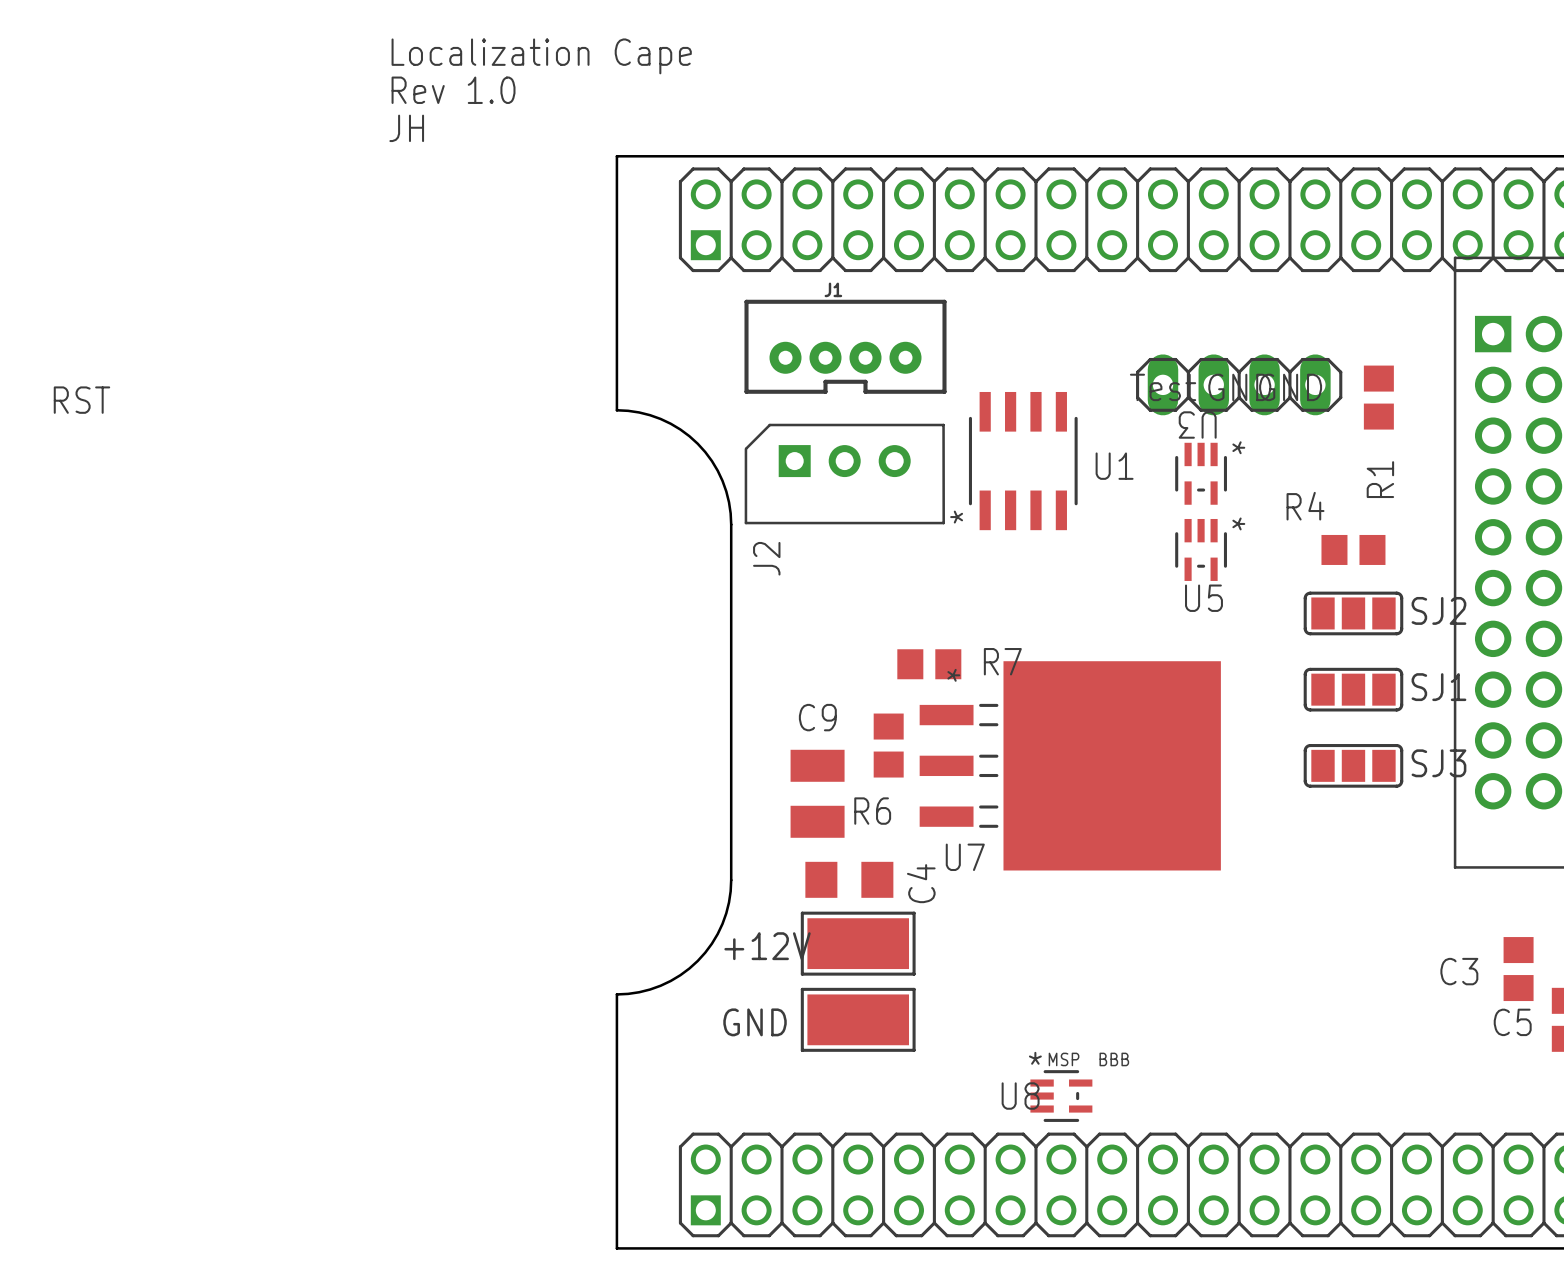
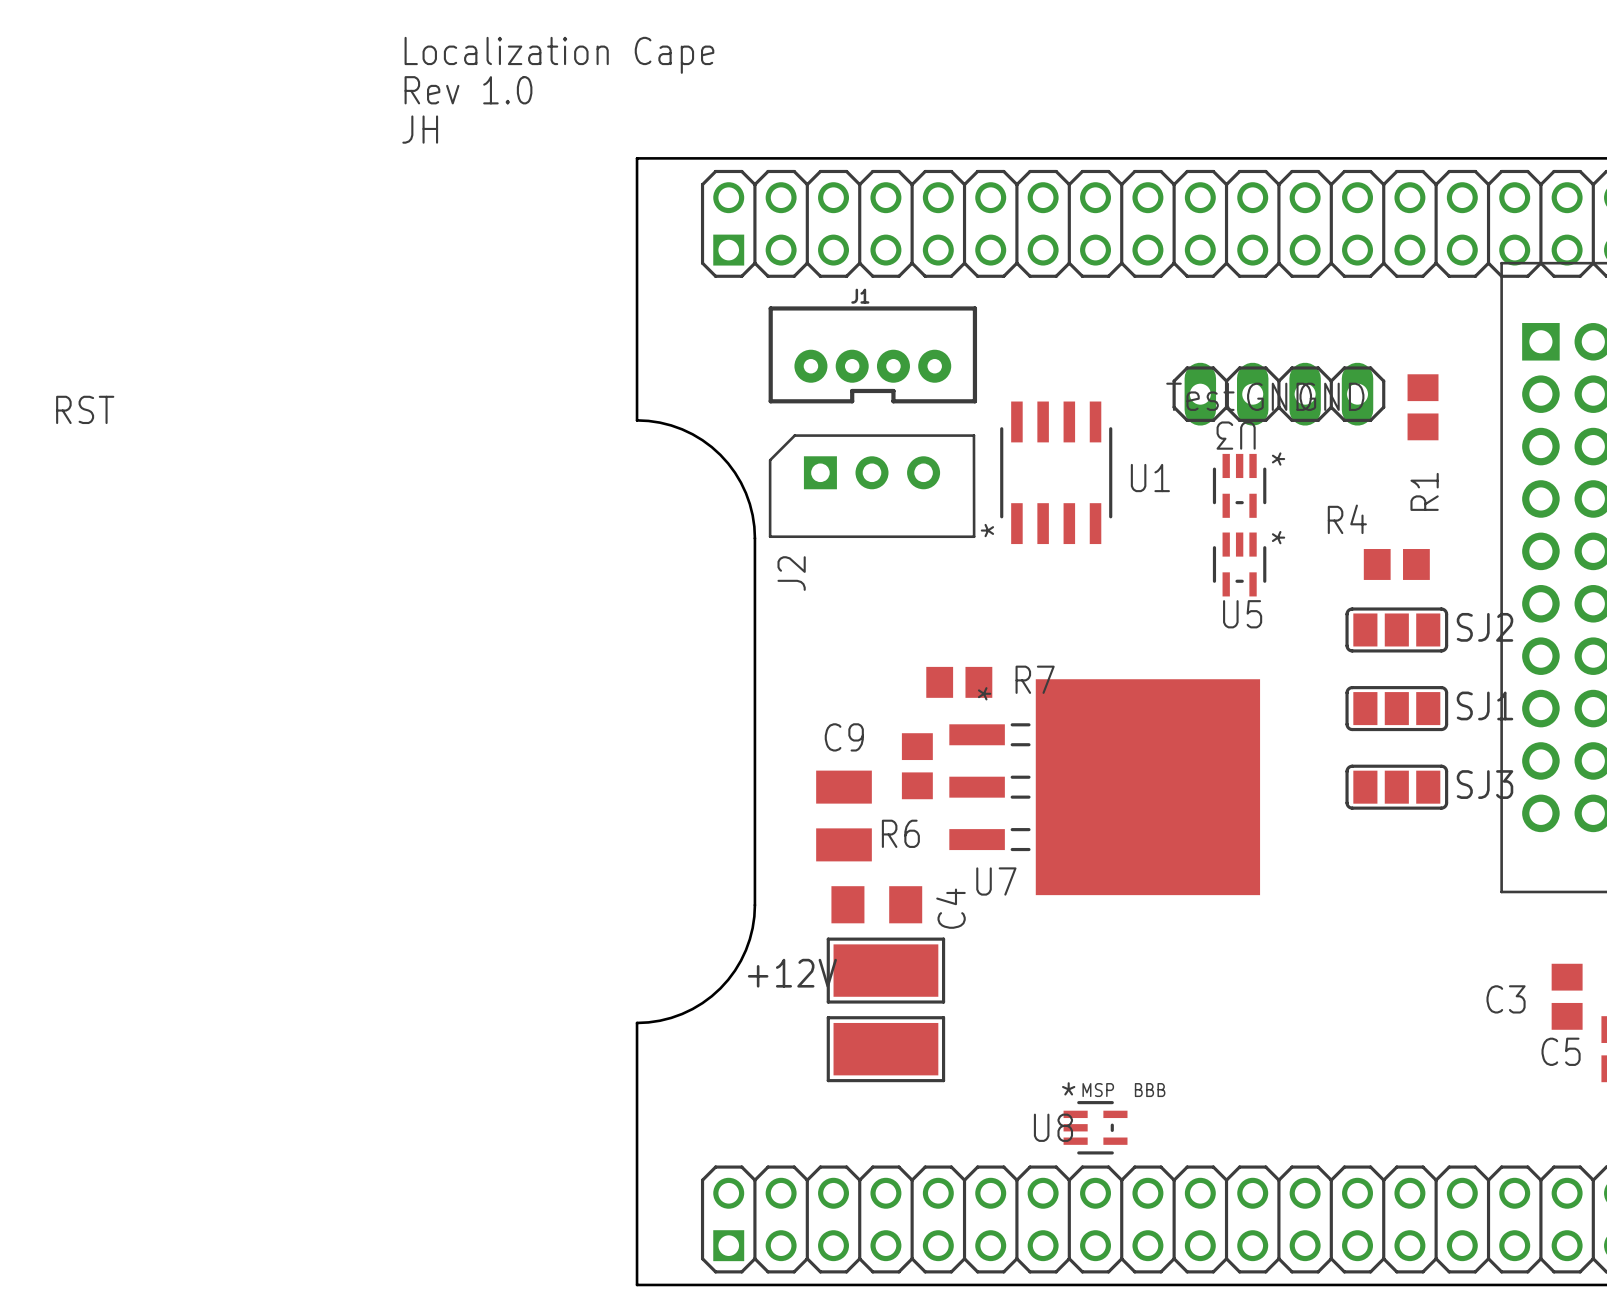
GND name: GND (755, 1022) -> none

